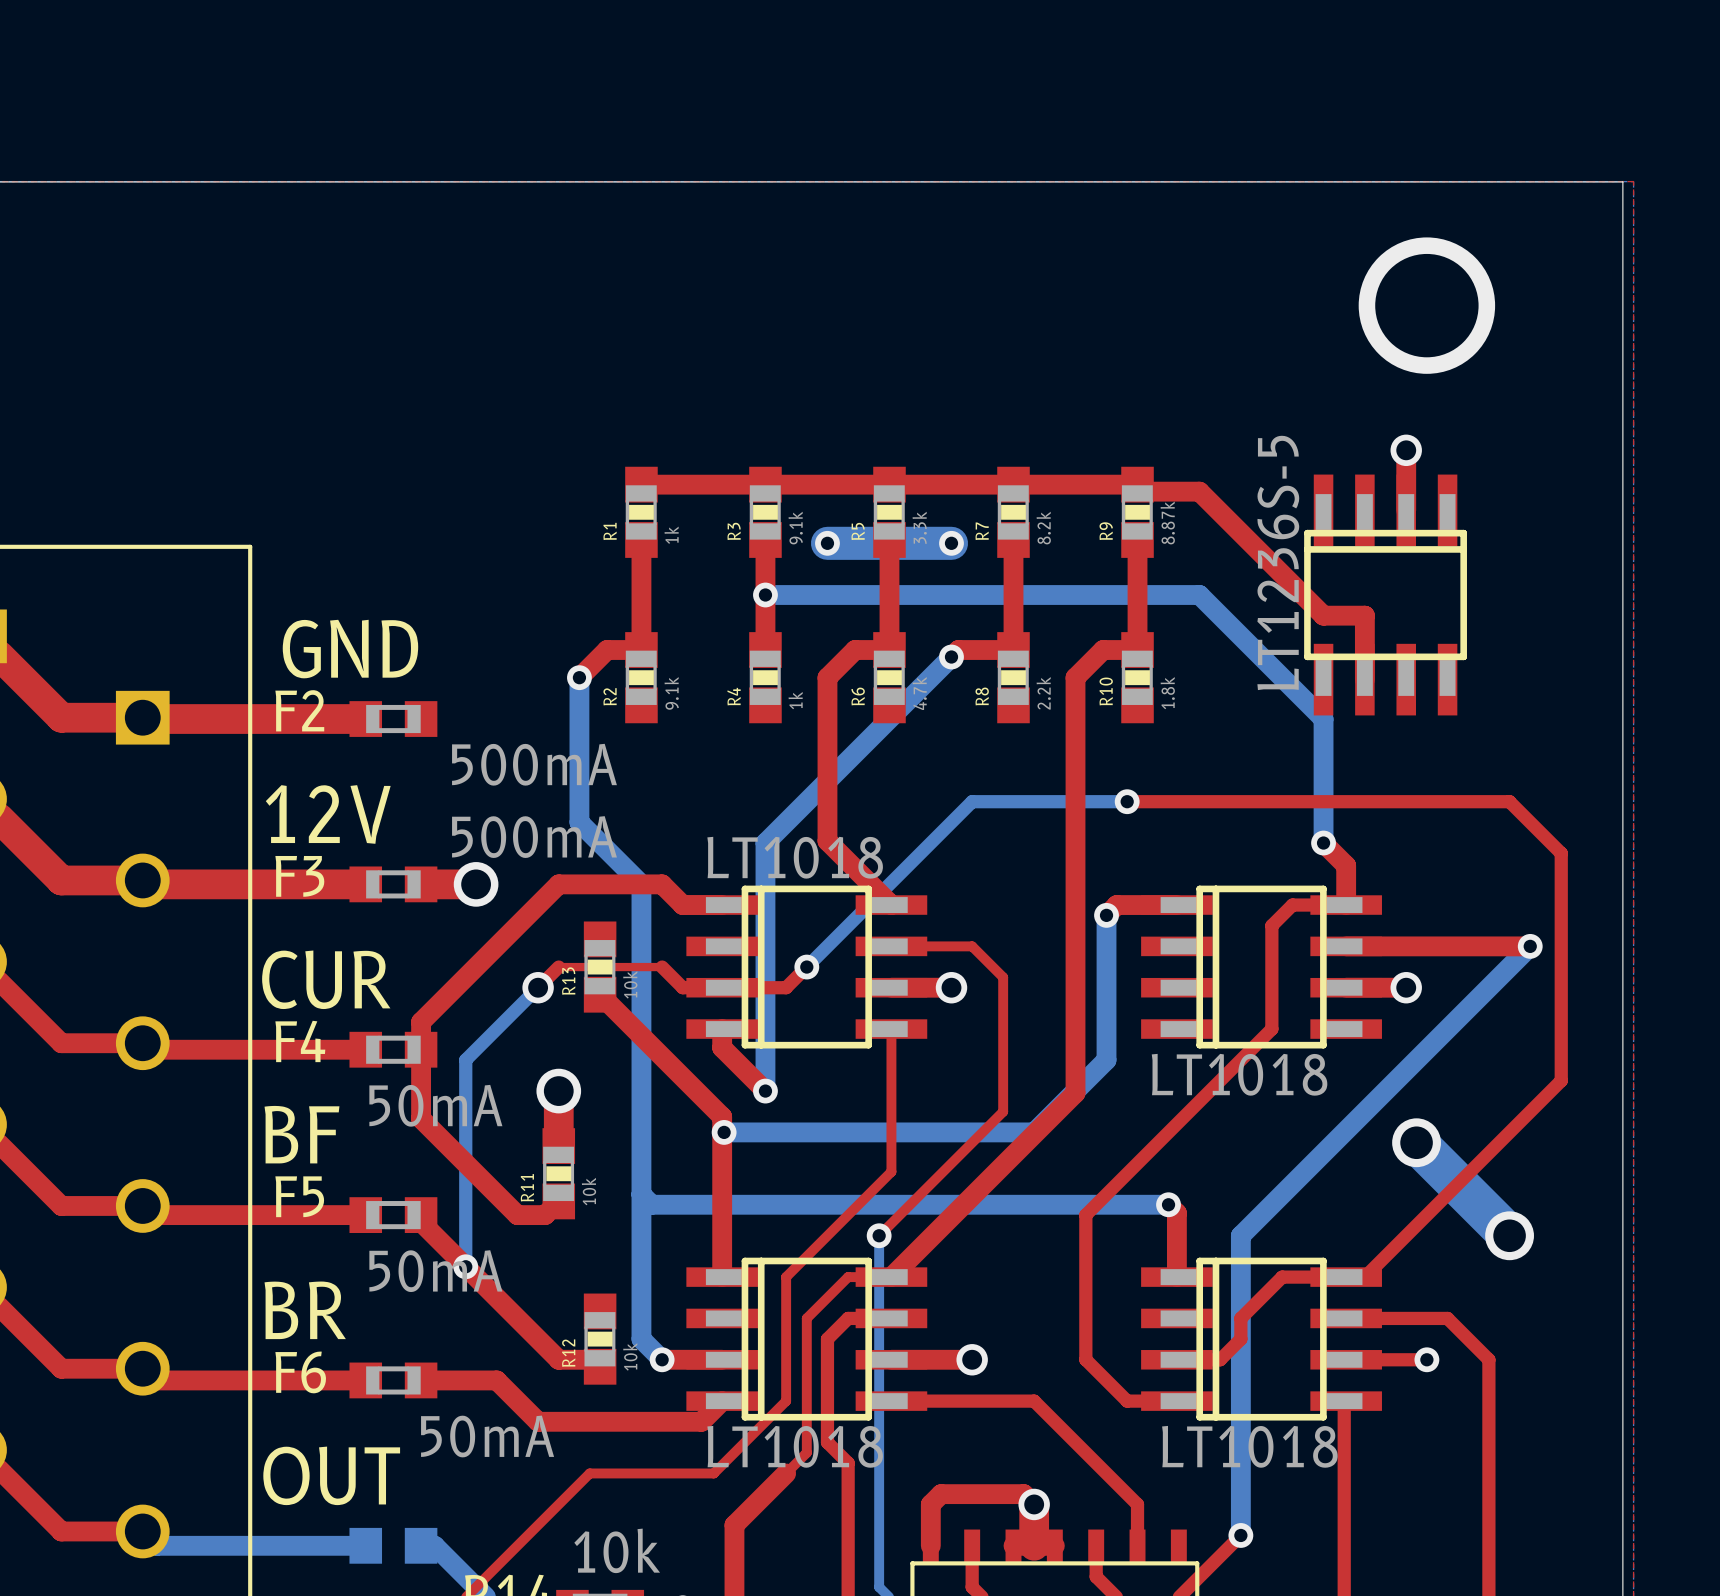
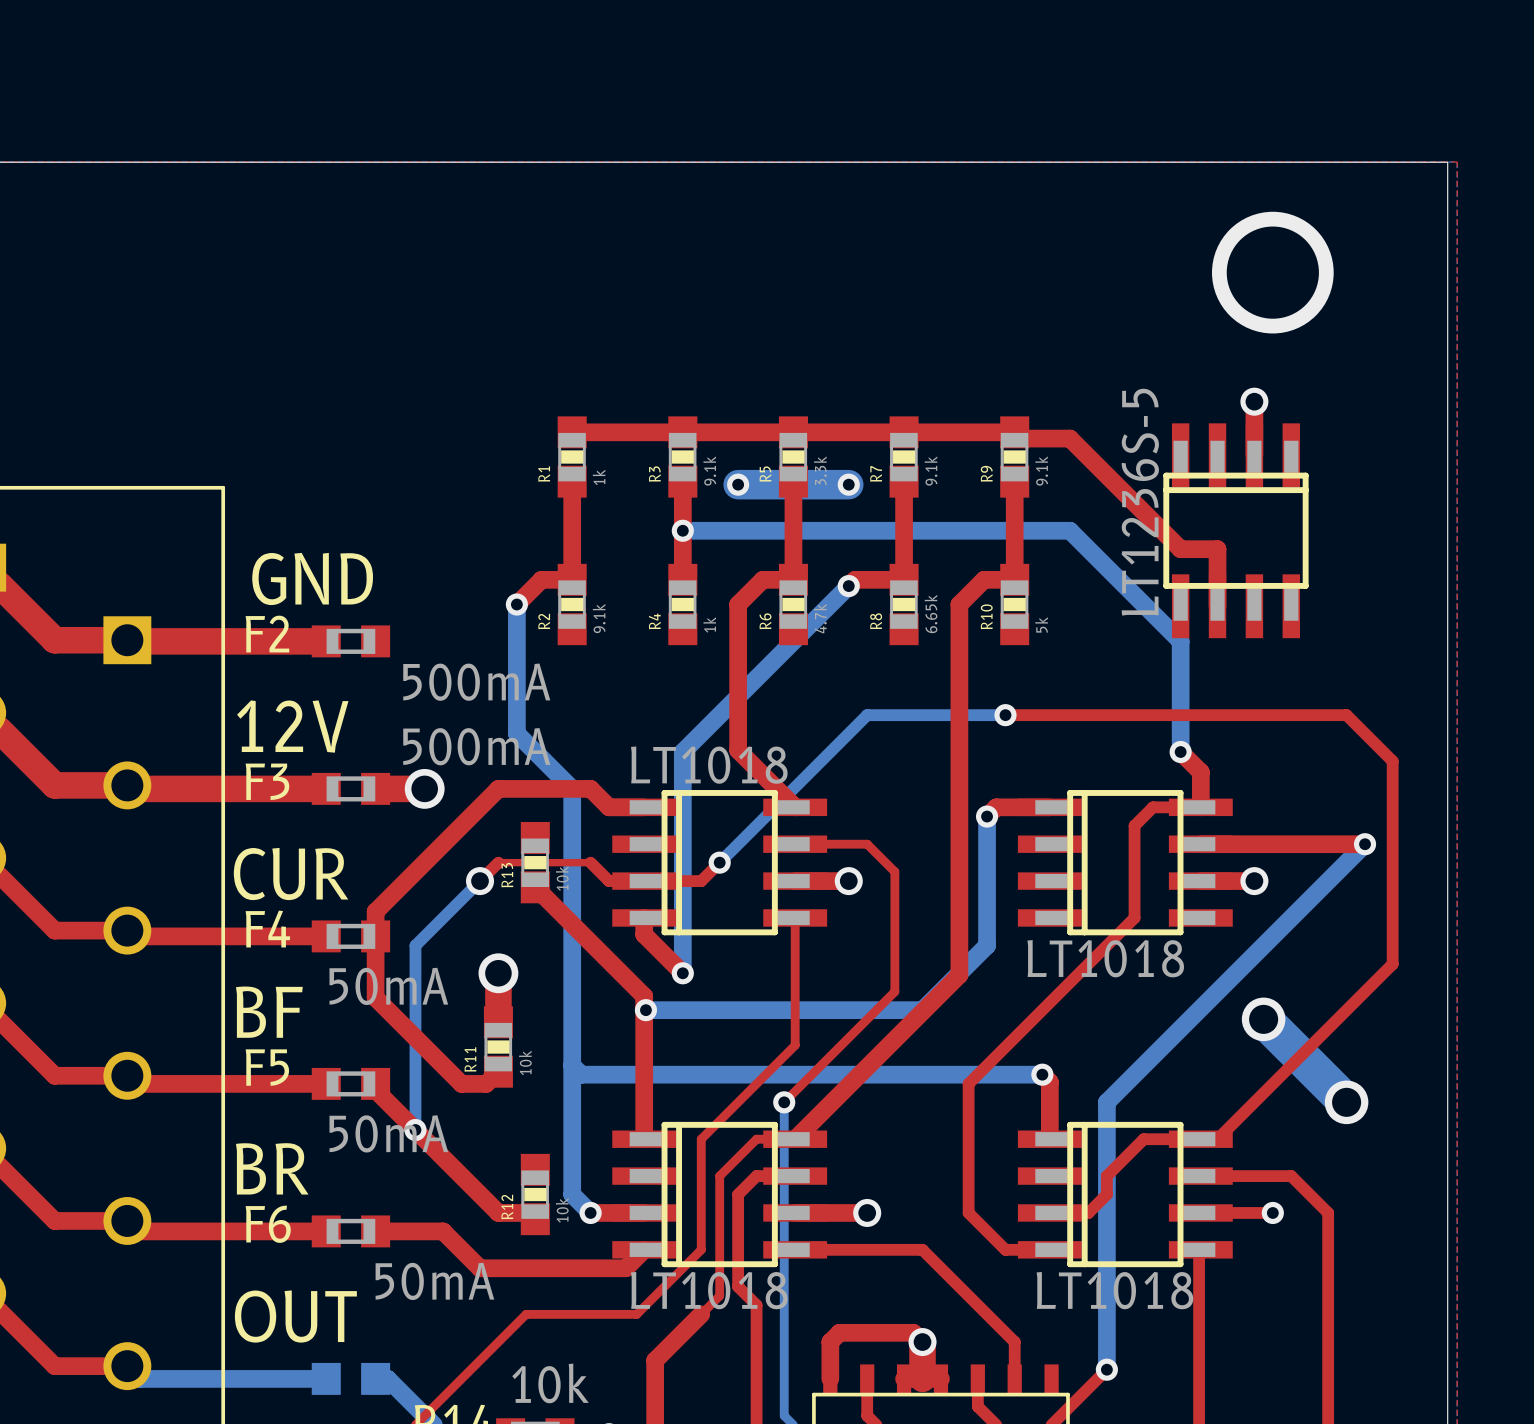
R9 value: 8.87k (1167, 522) -> 9.1k (1041, 471)
R7 value: 8.2k (1043, 528) -> 9.1k (931, 471)
R8 value: 2.2k (1043, 693) -> 6.65k (931, 614)
R10 value: 1.8k (1167, 693) -> 5k (1041, 624)

